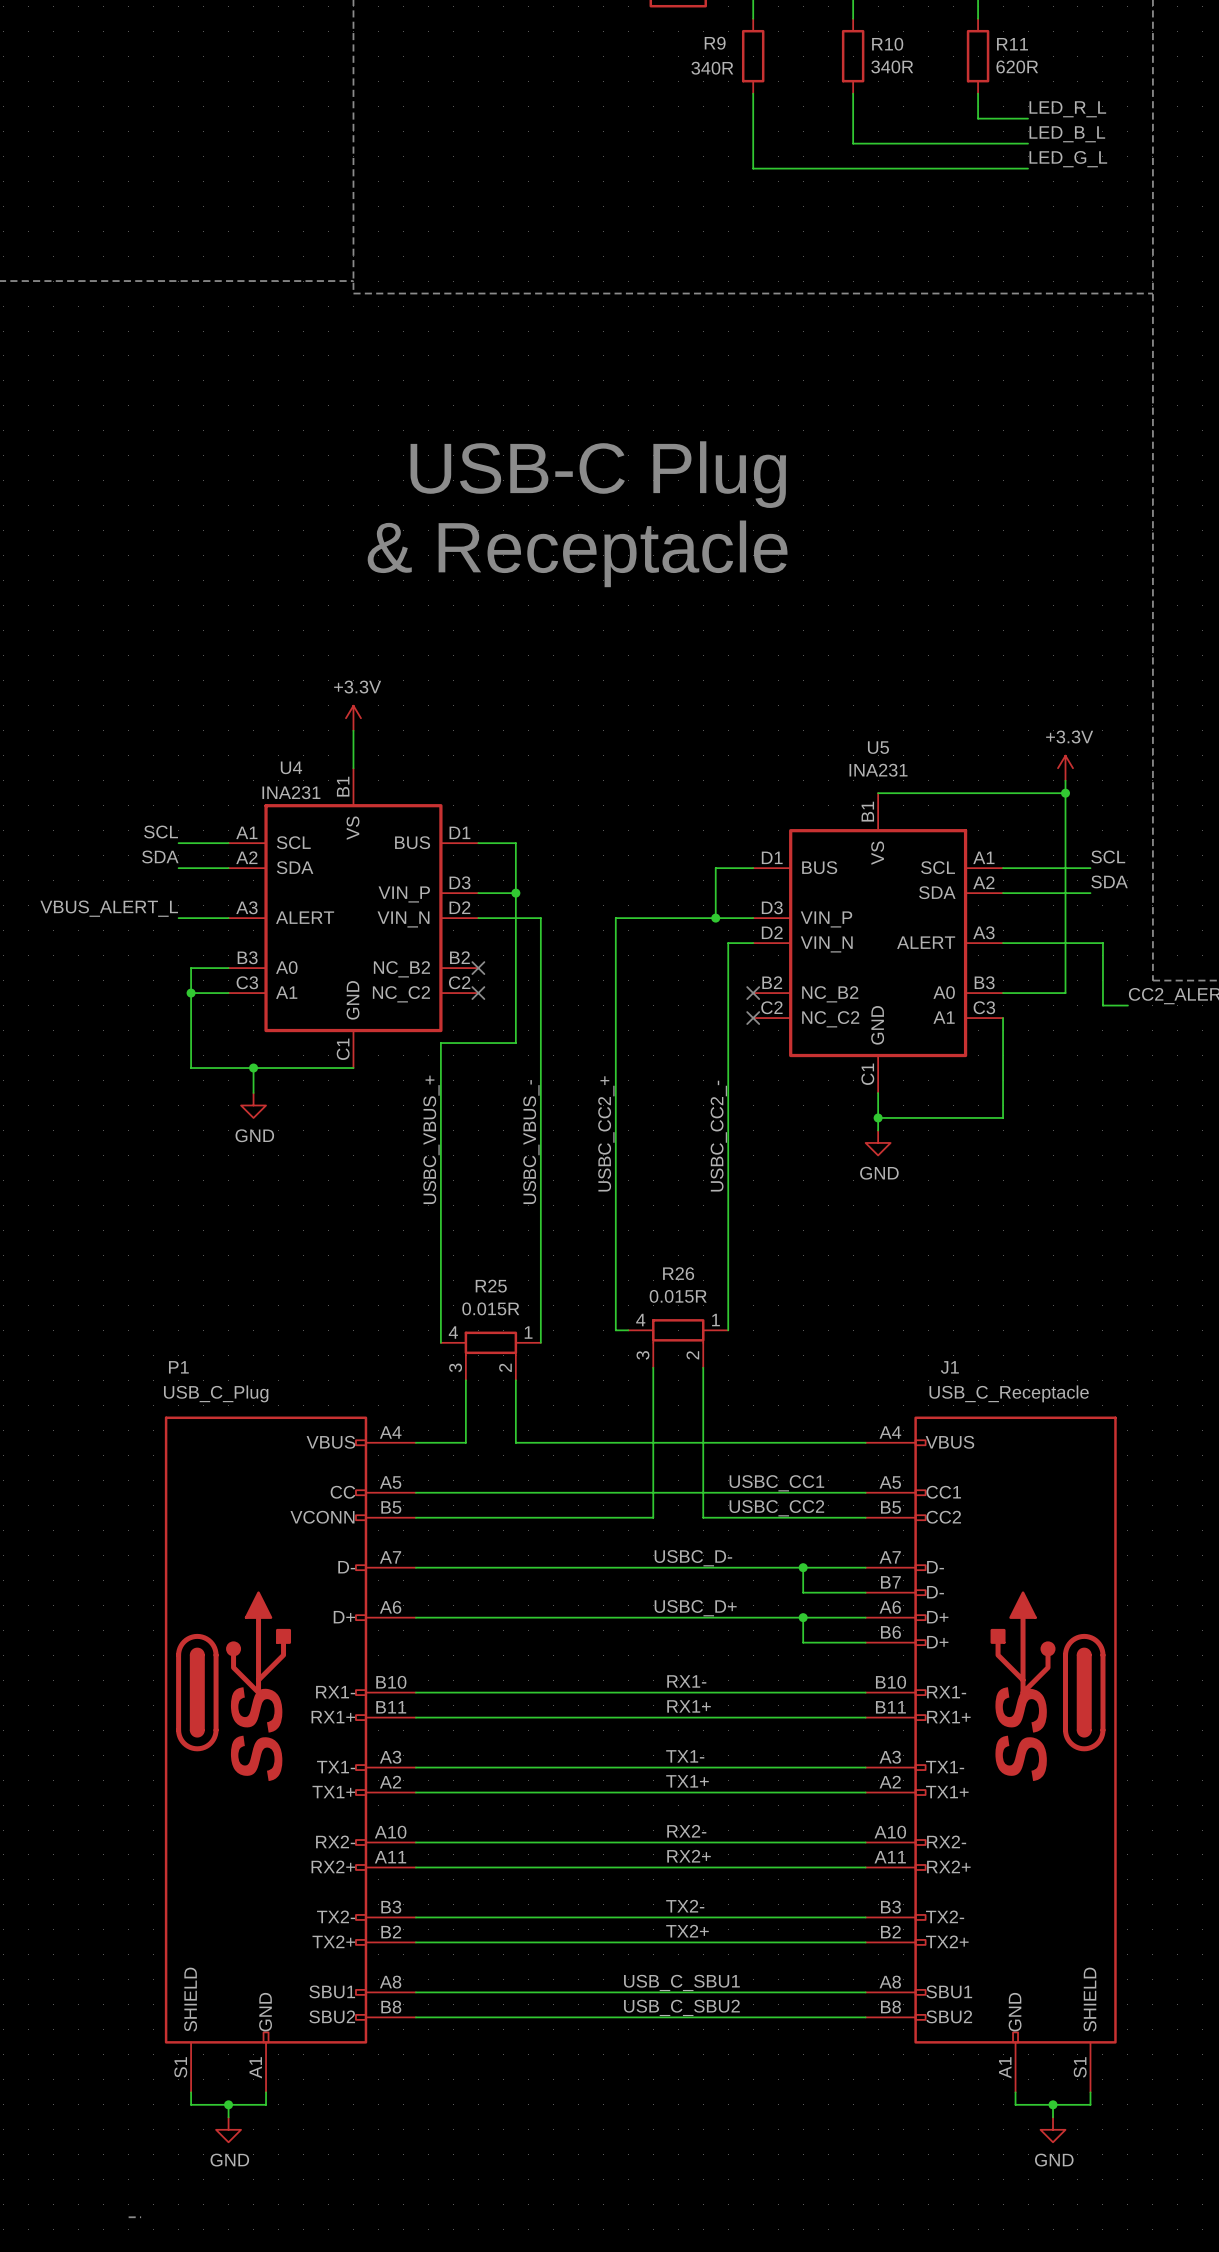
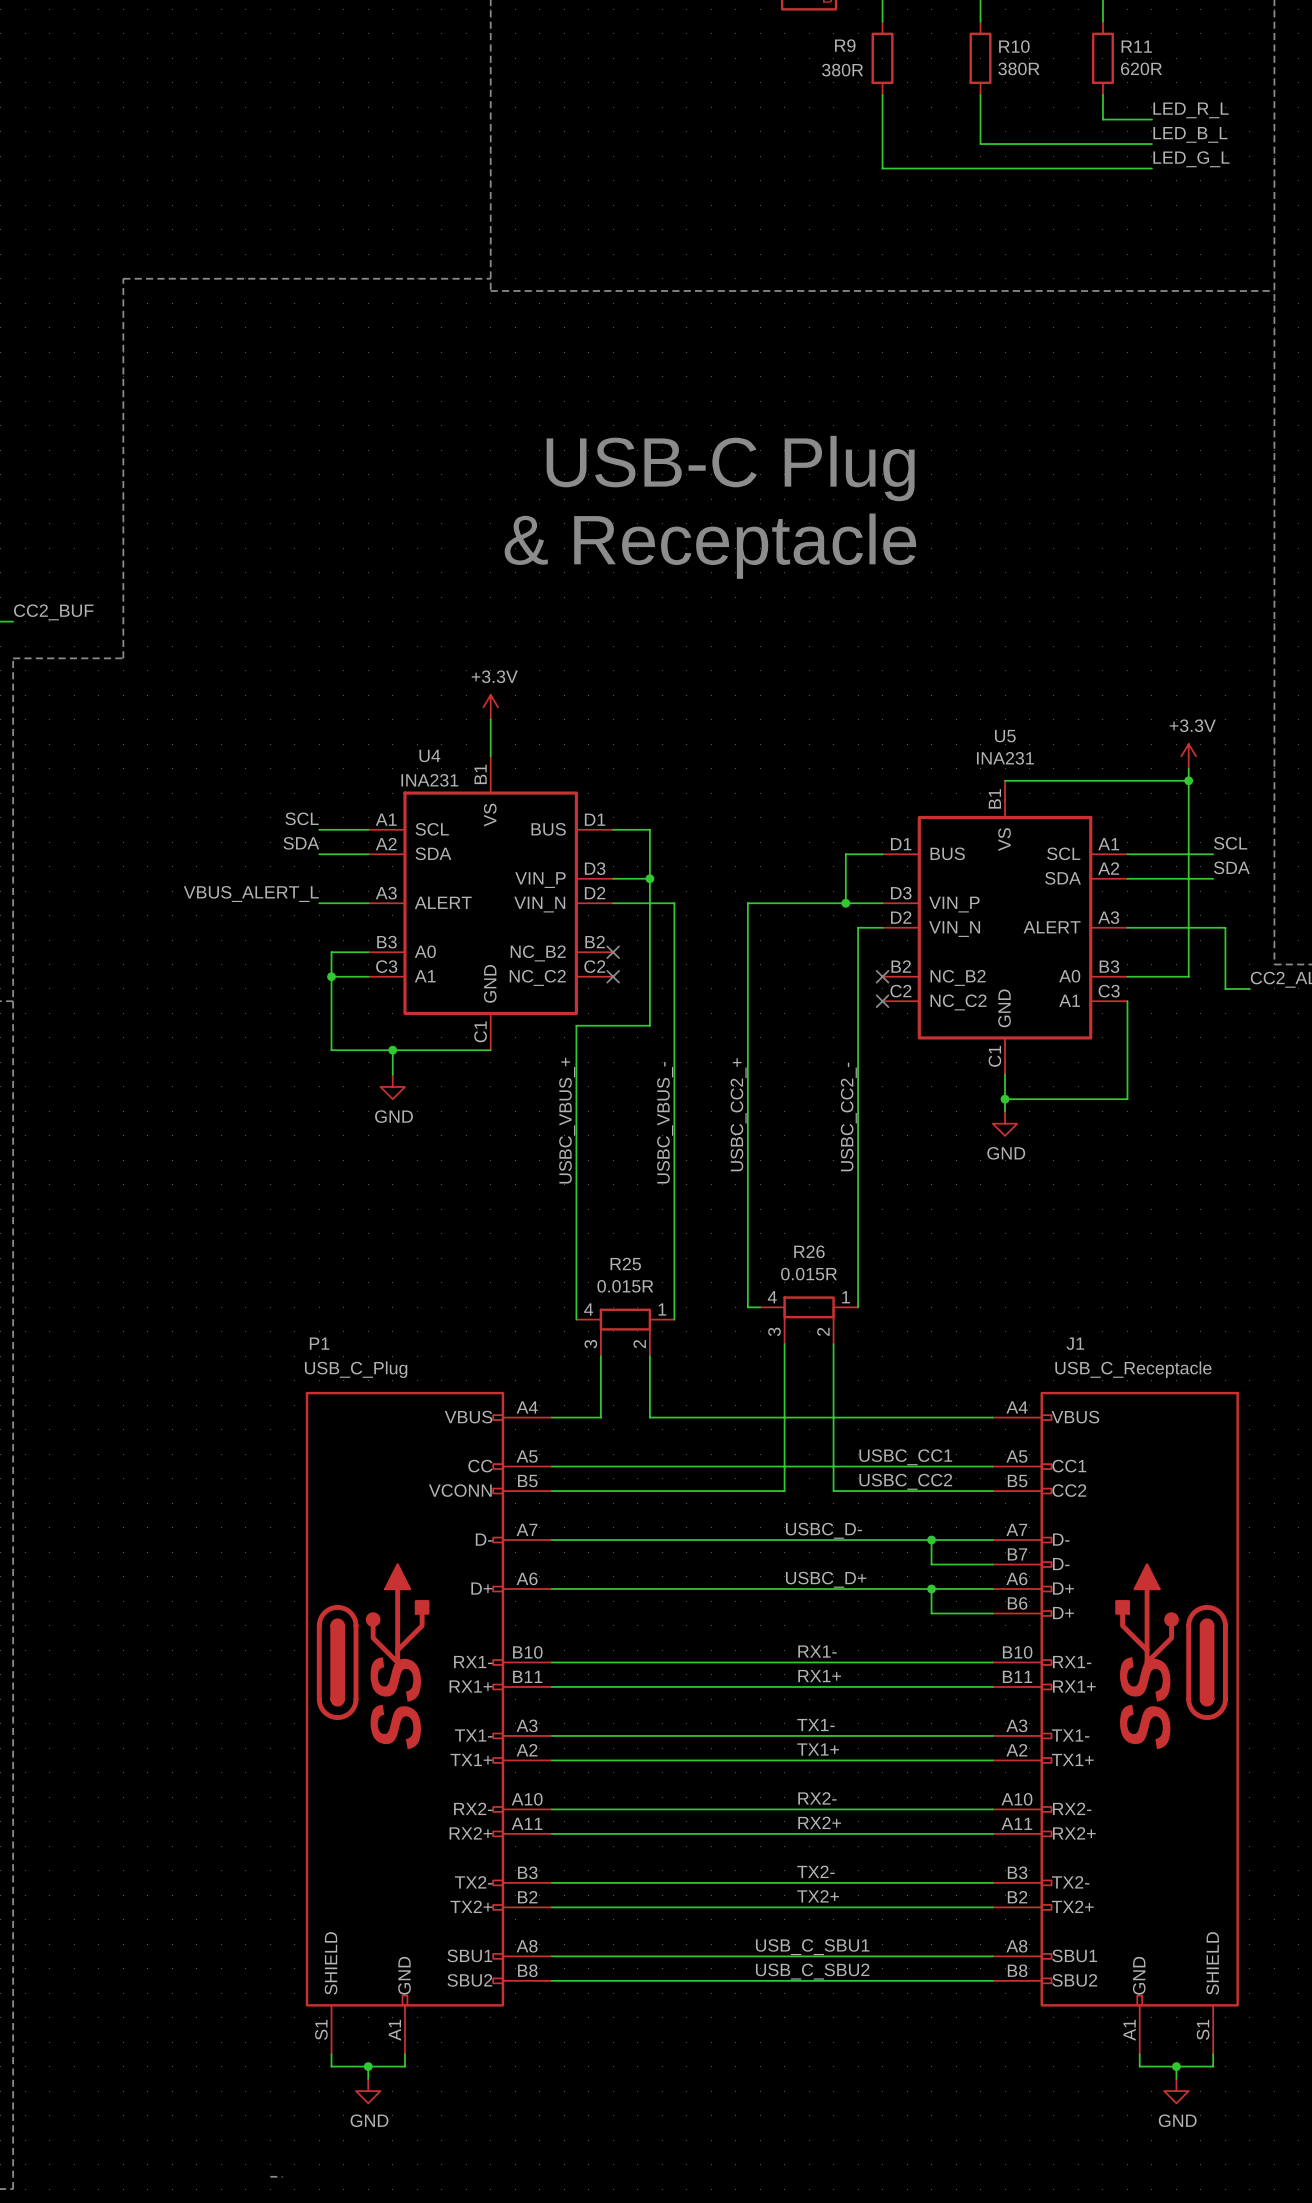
R10 value: 340R (892, 66) -> 380R (1018, 68)
R9 value: 340R (712, 68) -> 380R (842, 70)

